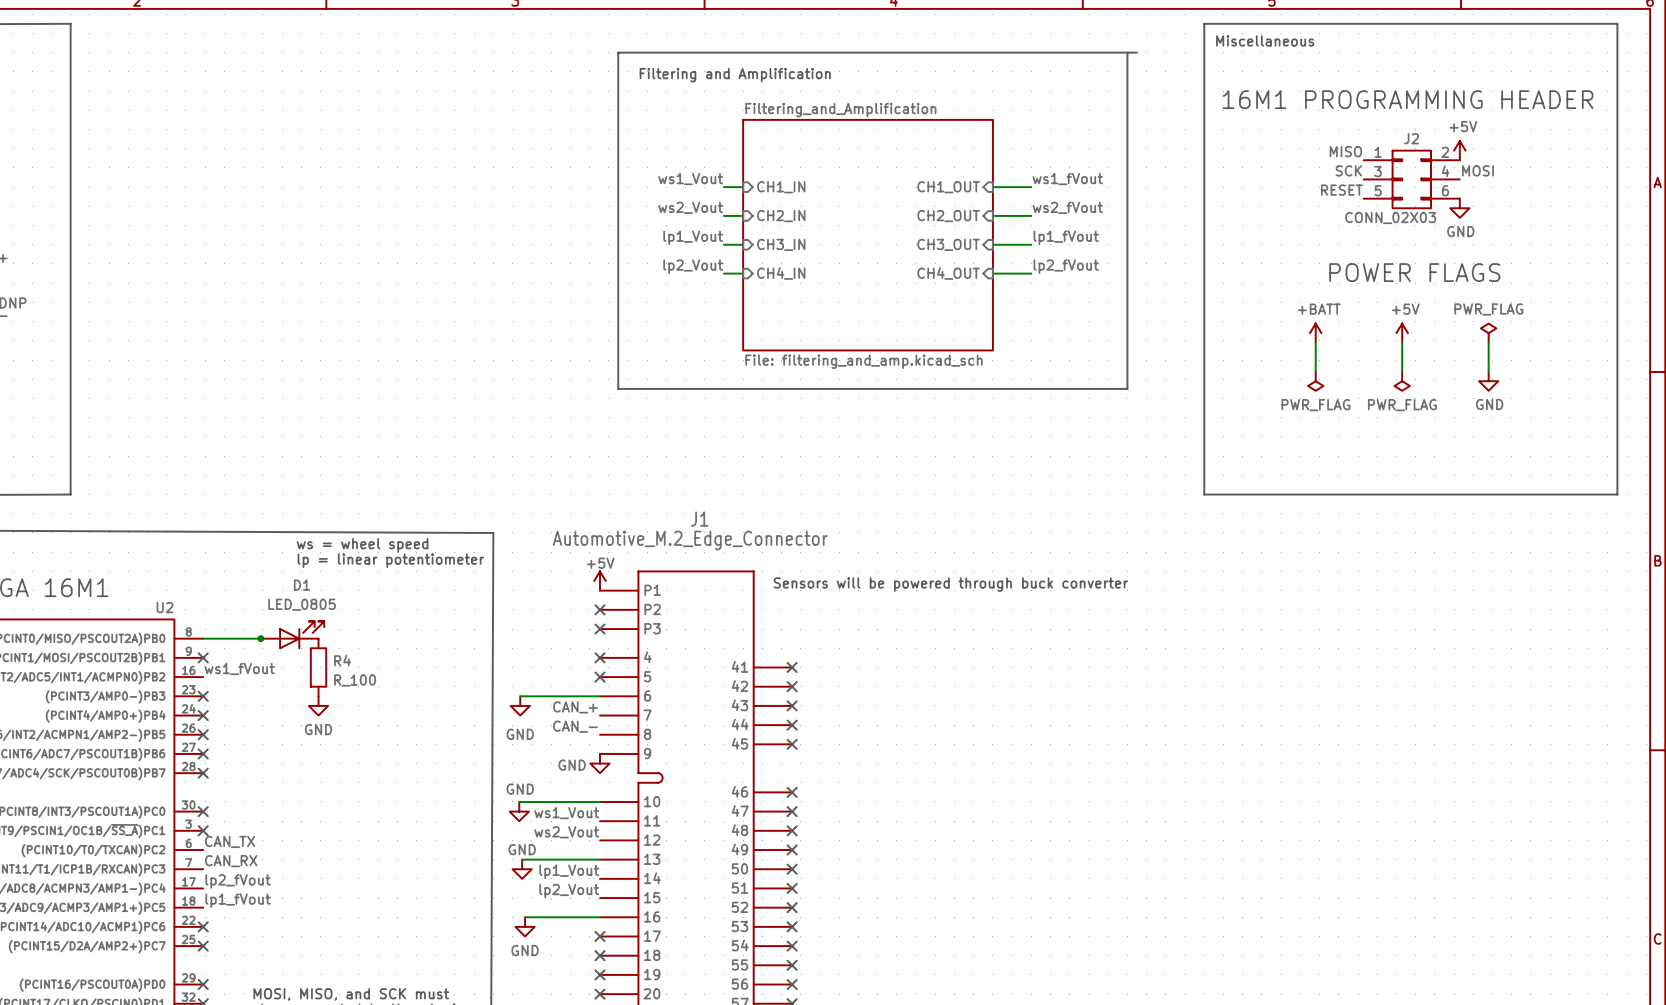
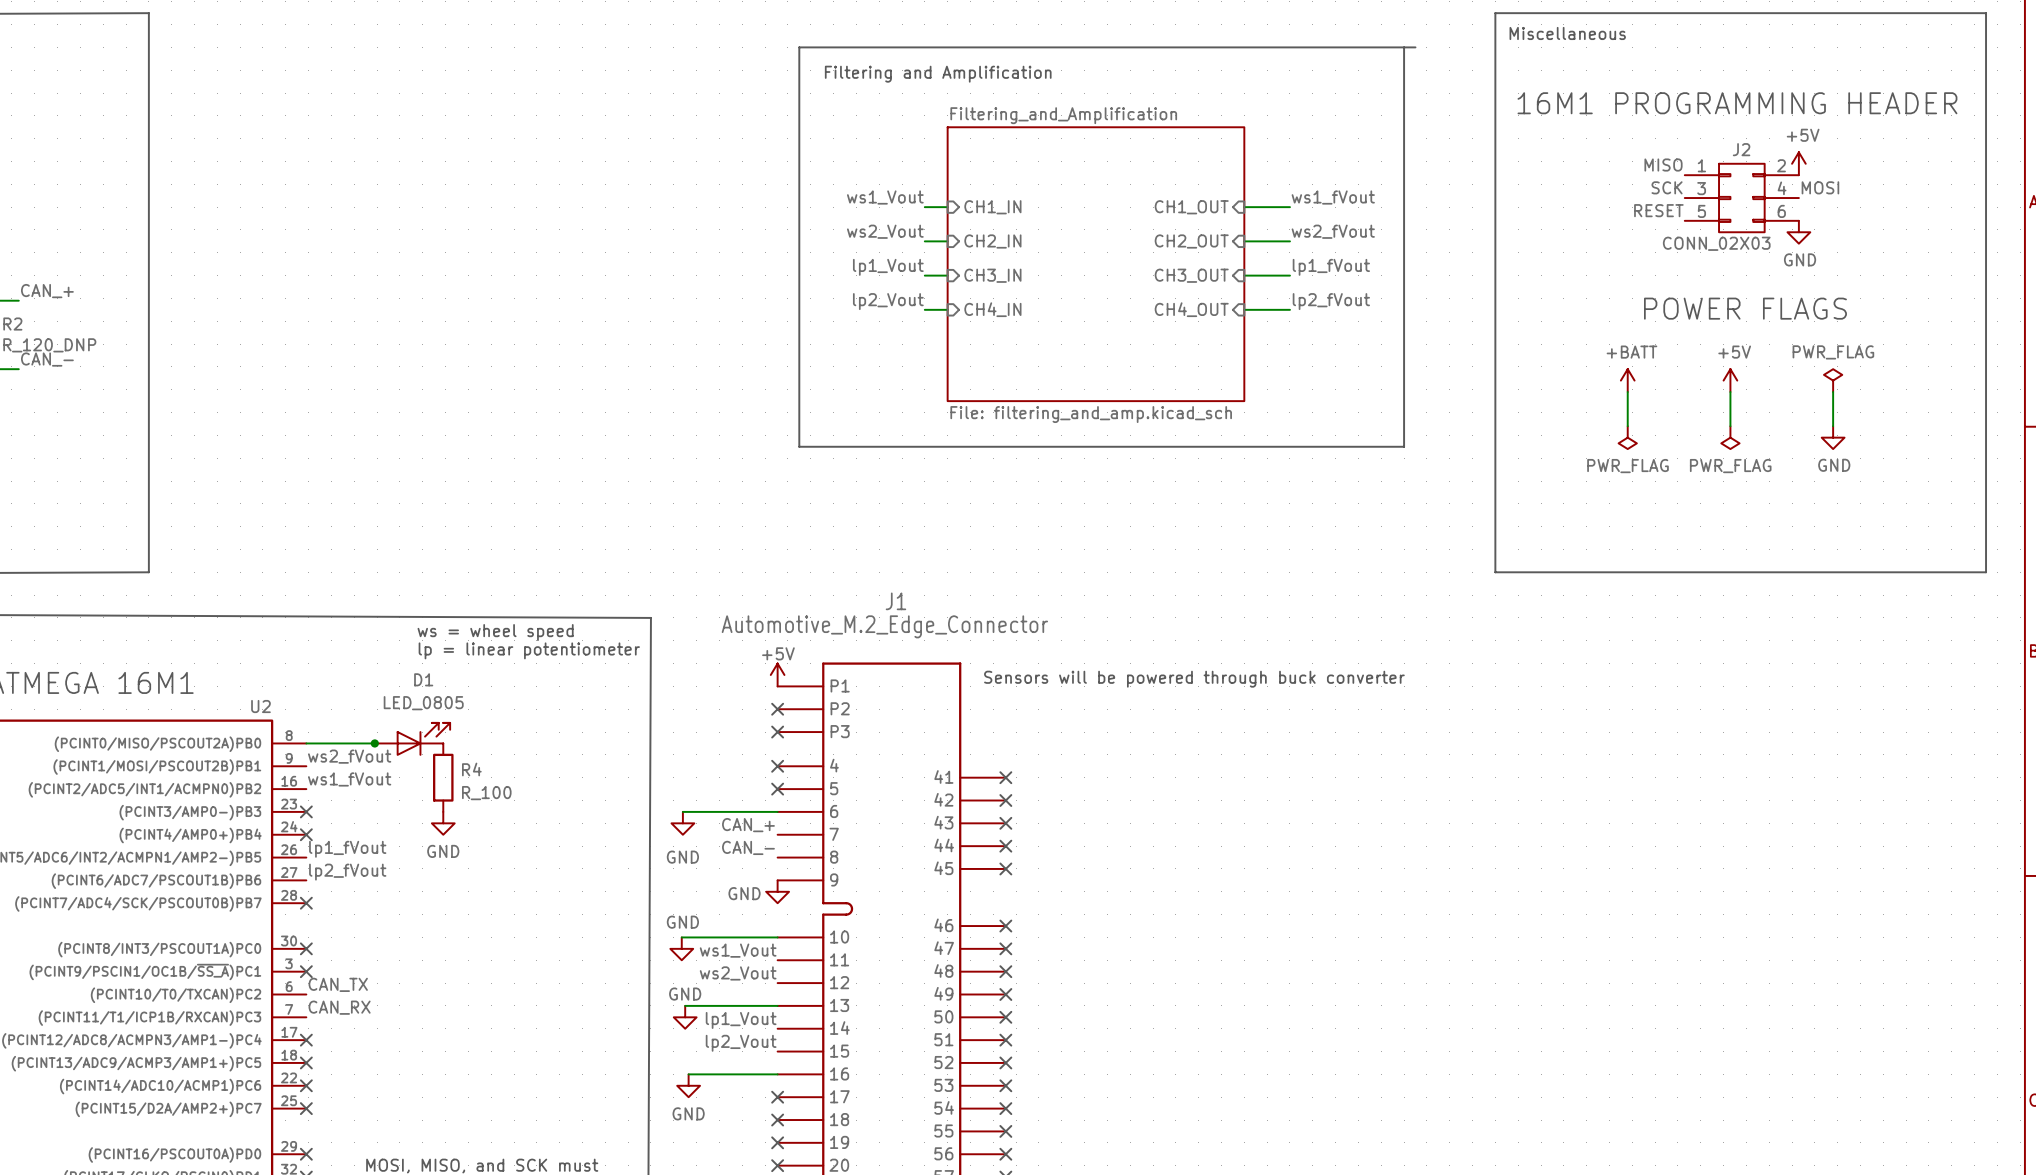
label: none -> ws2_fVout (349, 756)
no-connect mark: (203, 657) -> none
no-connect mark: (203, 734) -> none
no-connect mark: (203, 753) -> none
label position: lp2_fVout (238, 881) -> lp2_fVout (347, 872)
no-connect mark: none -> (306, 1040)
label position: lp1_fVout (238, 900) -> lp1_fVout (347, 849)
no-connect mark: none -> (306, 1062)

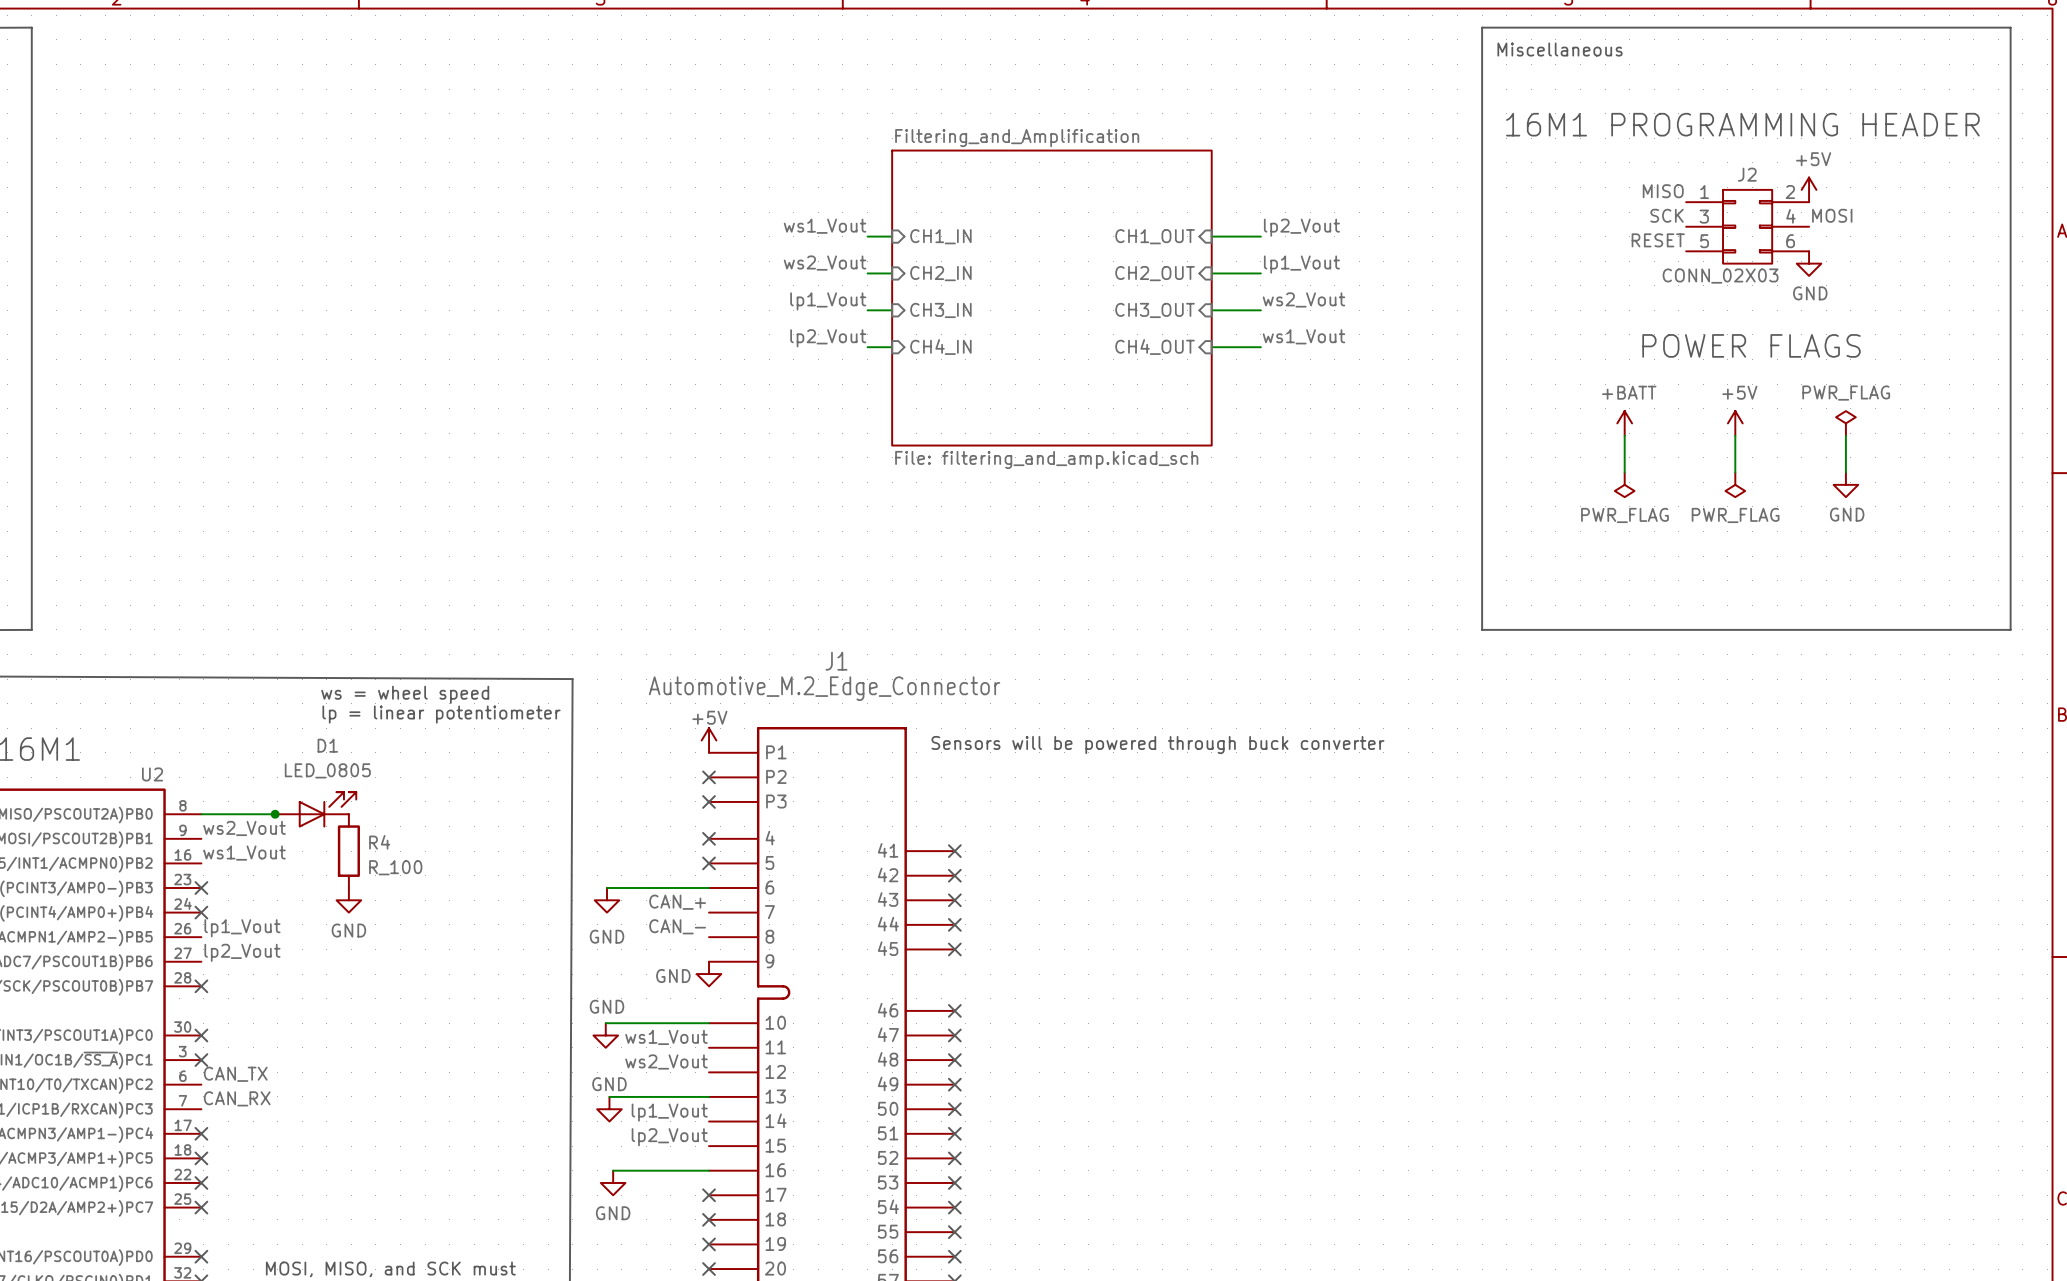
line: (1404, 47) (1404, 446) (799, 446) (799, 47) (1415, 47) -> none
text: Filtering and Amplification (938, 74) -> none
label: ws1_fVout (1333, 197) -> lp2_Vout (1301, 227)
label: ws2_fVout (1333, 231) -> lp1_Vout (1301, 264)
label: lp1_fVout (1331, 267) -> ws2_Vout (1303, 299)
label: lp2_fVout (1331, 301) -> ws1_Vout (1303, 336)
label: ws2_fVout (349, 756) -> ws2_Vout (244, 828)
label: ws1_fVout (349, 779) -> ws1_Vout (244, 853)
label: lp1_fVout (347, 849) -> lp1_Vout (242, 928)
label: lp2_fVout (347, 872) -> lp2_Vout (242, 952)

